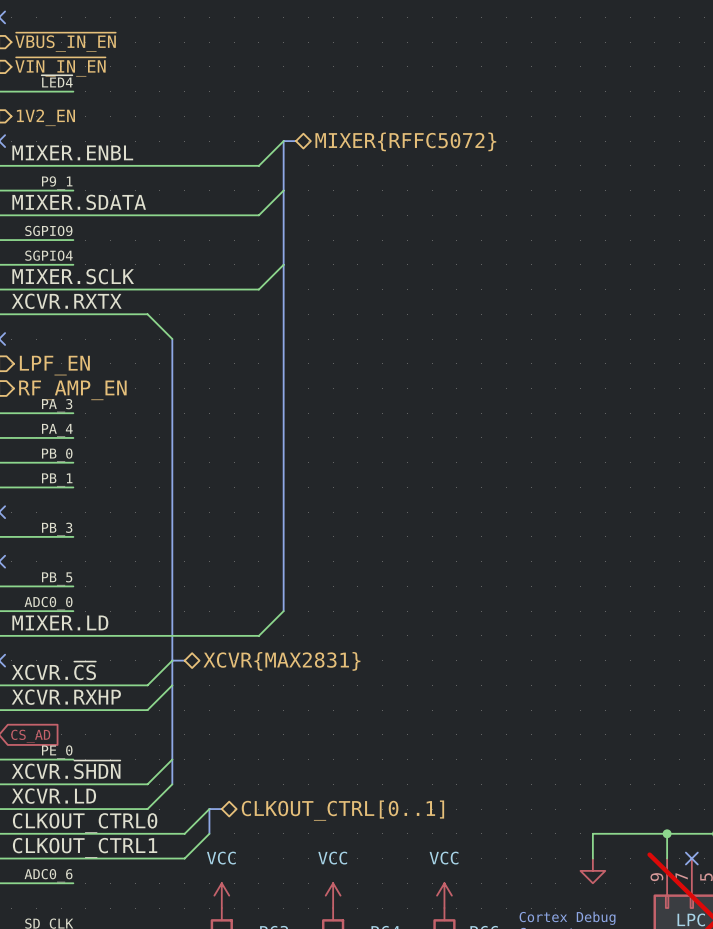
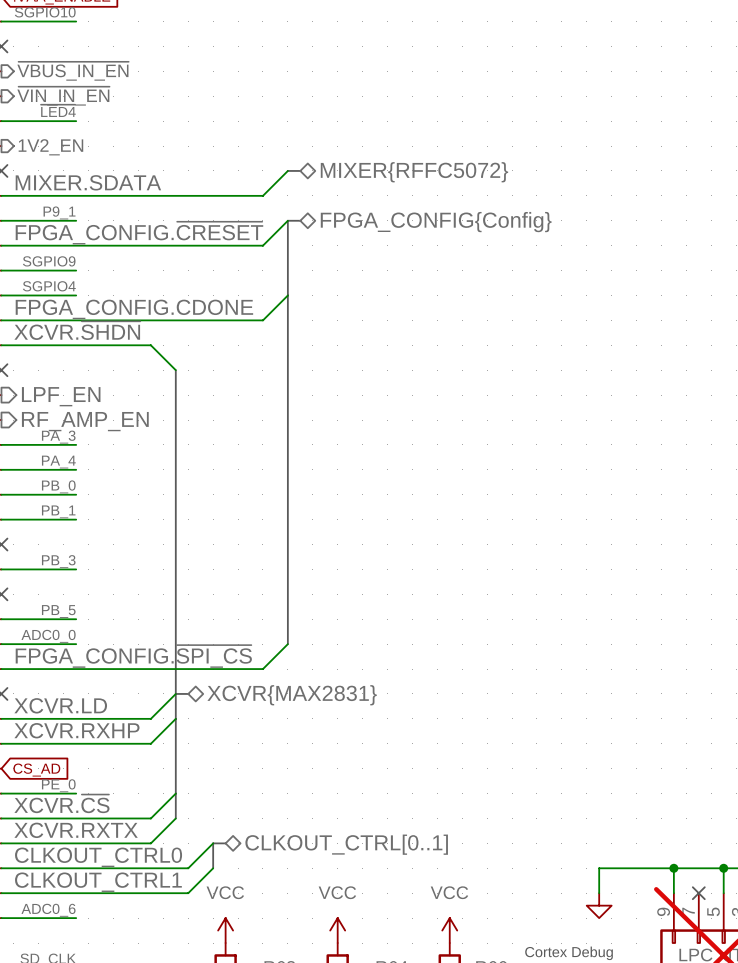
bus: (283, 141) (283, 190) -> (300, 220) (287, 220)
label: MIXER.ENBL (72, 152) -> MIXER.SDATA (88, 182)
hierarchical label: none -> FPGA_CONFIG{Config} (436, 222)
label: MIXER.SDATA (79, 202) -> FPGA_CONFIG.~{CRESET} (139, 233)
label: MIXER.SCLK (73, 276) -> FPGA_CONFIG.CDONE (134, 309)
label: XCVR.RXTX (66, 301) -> XCVR.~{SHDN} (77, 330)
label: MIXER.LD (60, 622) -> FPGA_CONFIG.~{SPI_CS} (133, 656)
label: XCVR.~{CS} (53, 670) -> XCVR.LD (60, 705)
label: XCVR.~{SHDN} (66, 769) -> XCVR.~{CS} (61, 803)
label: XCVR.LD (53, 796) -> XCVR.RXTX (76, 830)

